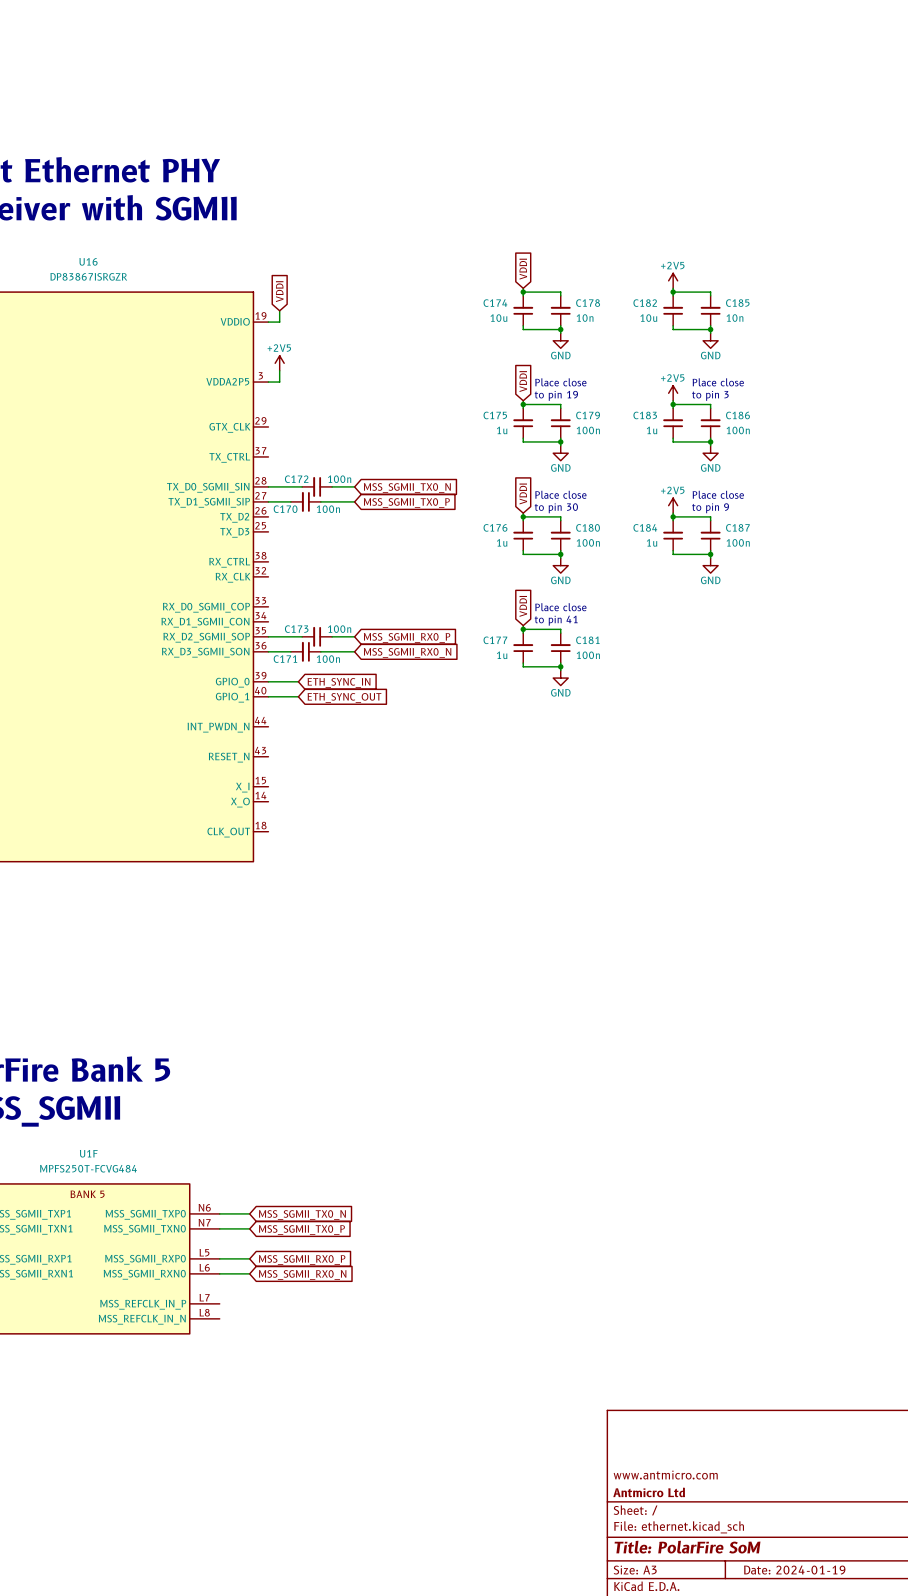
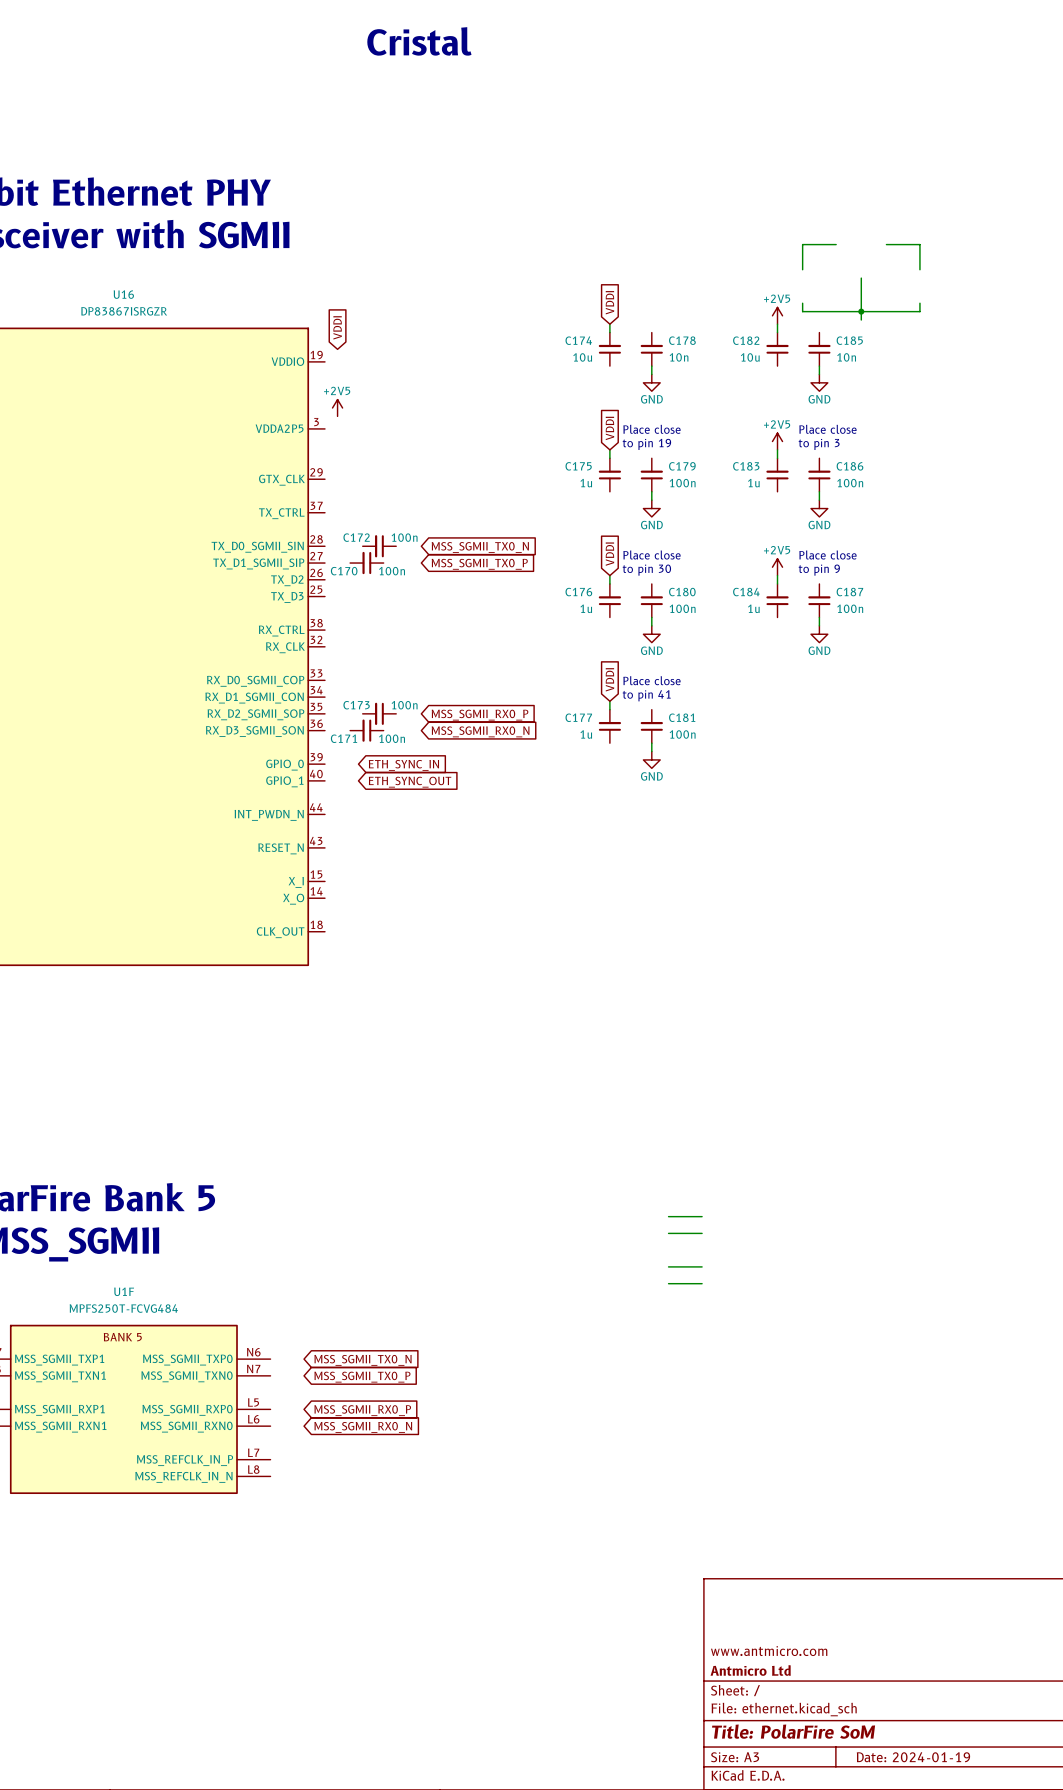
text: none -> Cristal (419, 41)
wire: none -> (836, 244) (802, 244) (802, 269)
wire: none -> (886, 244) (919, 244) (919, 269)
wire: none -> (861, 278) (861, 320)
wire: none -> (802, 303) (802, 311) (919, 311) (919, 303)
junction: none -> (861, 311)
wire: (523, 292) (560, 292) (560, 295) -> none
junction: (523, 292) -> none
wire: (673, 292) (710, 292) (710, 295) -> none
junction: (673, 292) -> none
wire: (279, 310) (279, 322) (268, 322) -> none
wire: (523, 325) (523, 329) (560, 329) -> none
wire: (673, 325) (673, 329) (710, 329) -> none
junction: (560, 329) -> none
junction: (710, 329) -> none
wire: (279, 370) (279, 382) (268, 382) -> none
wire: (523, 404) (560, 404) (560, 408) -> none
junction: (523, 404) -> none
wire: (673, 404) (710, 404) (710, 408) -> none
junction: (673, 404) -> none
wire: (523, 438) (523, 441) (560, 441) -> none
wire: (673, 438) (673, 441) (710, 441) -> none
junction: (560, 441) -> none
junction: (710, 441) -> none
wire: (268, 486) (302, 486) -> none
wire: (332, 486) (354, 486) -> none
wire: (268, 501) (290, 501) -> none
wire: (320, 501) (354, 501) -> none
wire: (523, 516) (560, 516) (560, 520) -> none
junction: (523, 516) -> none
wire: (673, 516) (710, 516) (710, 520) -> none
junction: (673, 516) -> none
wire: (523, 550) (523, 554) (560, 554) -> none
wire: (673, 550) (673, 554) (710, 554) -> none
junction: (560, 554) -> none
junction: (710, 554) -> none
wire: (523, 629) (560, 629) (560, 633) -> none
junction: (523, 629) -> none
wire: (268, 636) (302, 636) -> none
wire: (332, 636) (354, 636) -> none
wire: (268, 651) (290, 651) -> none
wire: (320, 651) (354, 651) -> none
wire: (523, 663) (523, 666) (560, 666) -> none
junction: (560, 666) -> none
wire: (268, 681) (298, 681) -> none
wire: (268, 696) (298, 696) -> none
wire: none -> (668, 1216) (702, 1216)
wire: none -> (668, 1233) (702, 1233)
wire: none -> (668, 1266) (702, 1266)
wire: none -> (668, 1283) (702, 1283)
wire: (219, 1213) (249, 1213) -> none
wire: (219, 1228) (249, 1228) -> none
wire: (219, 1258) (249, 1258) -> none
wire: (219, 1273) (249, 1273) -> none

